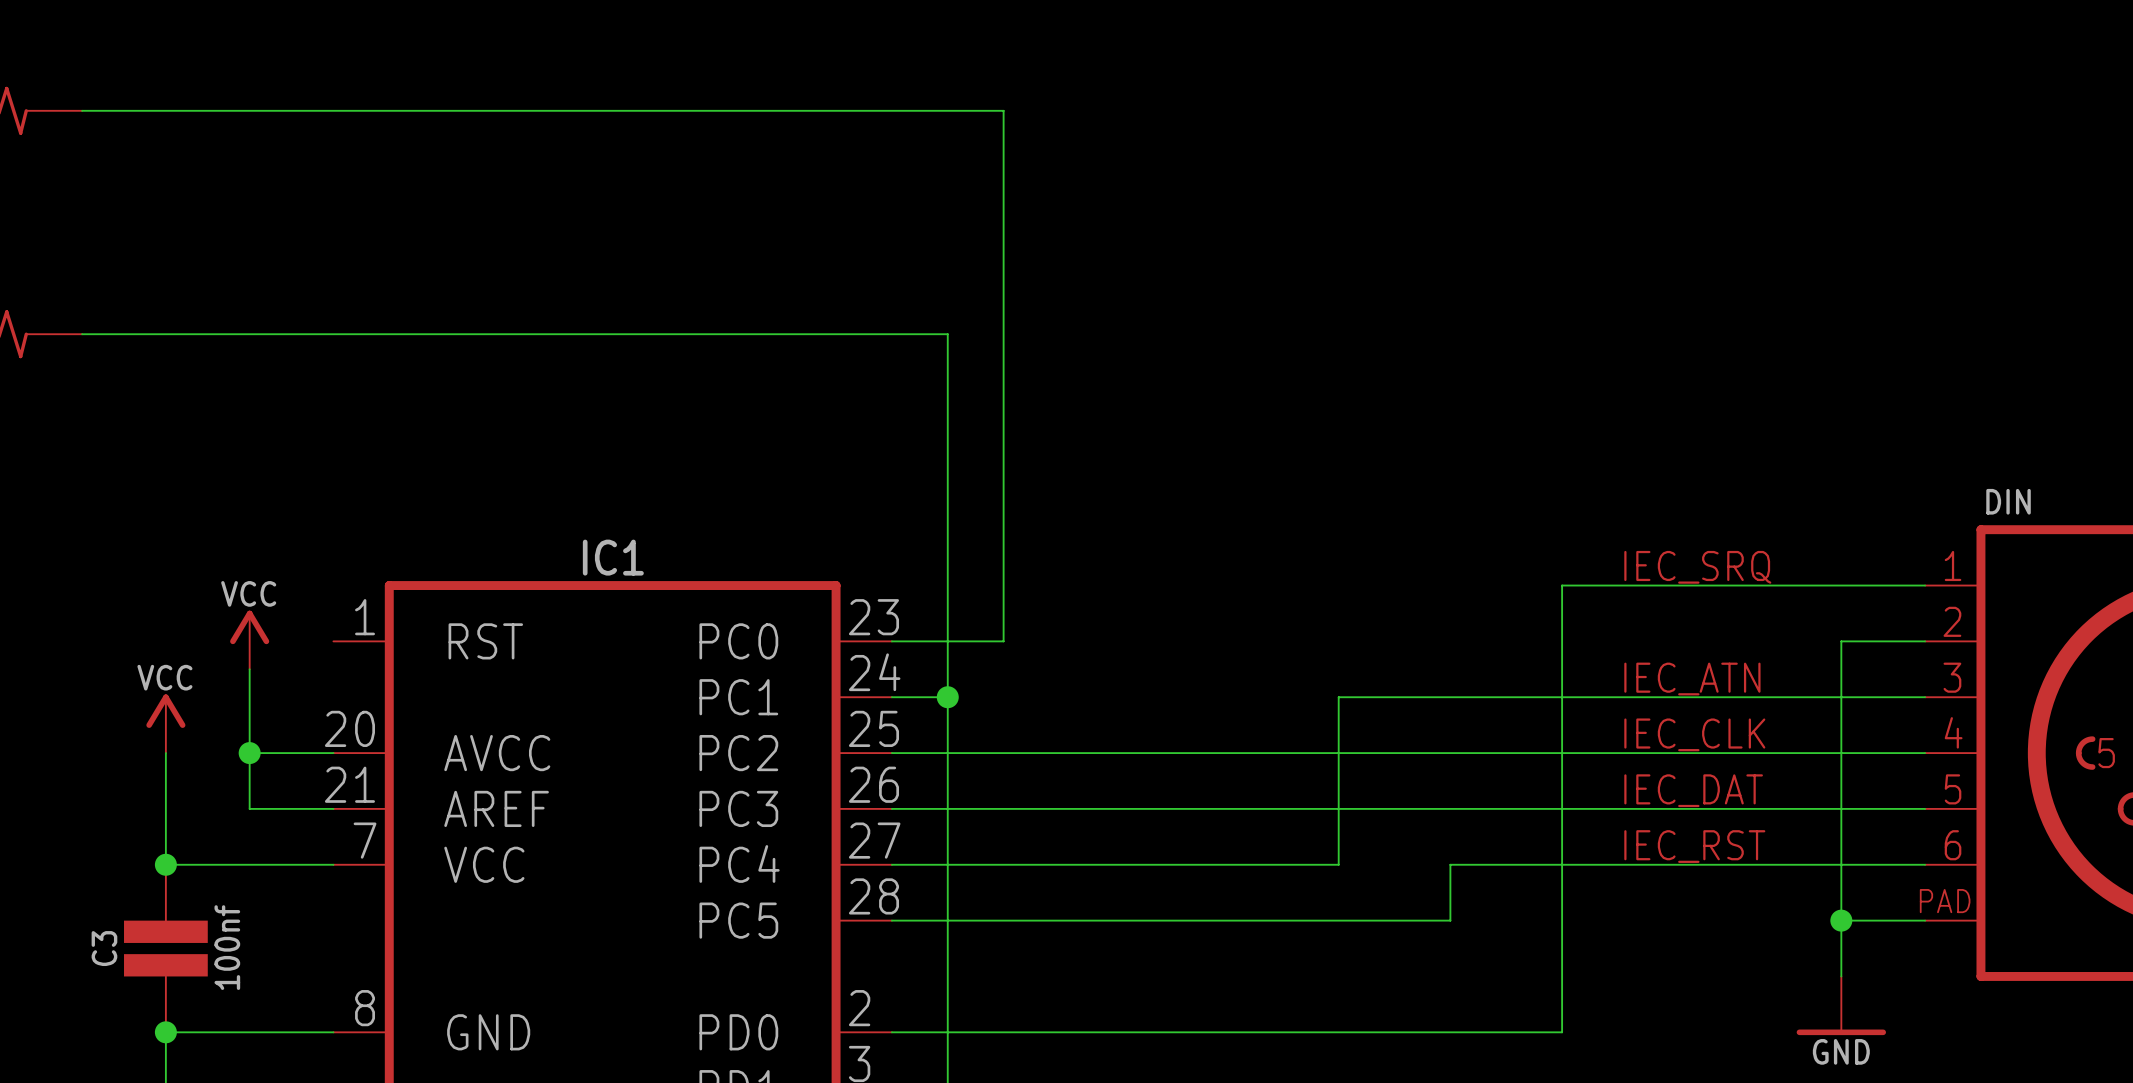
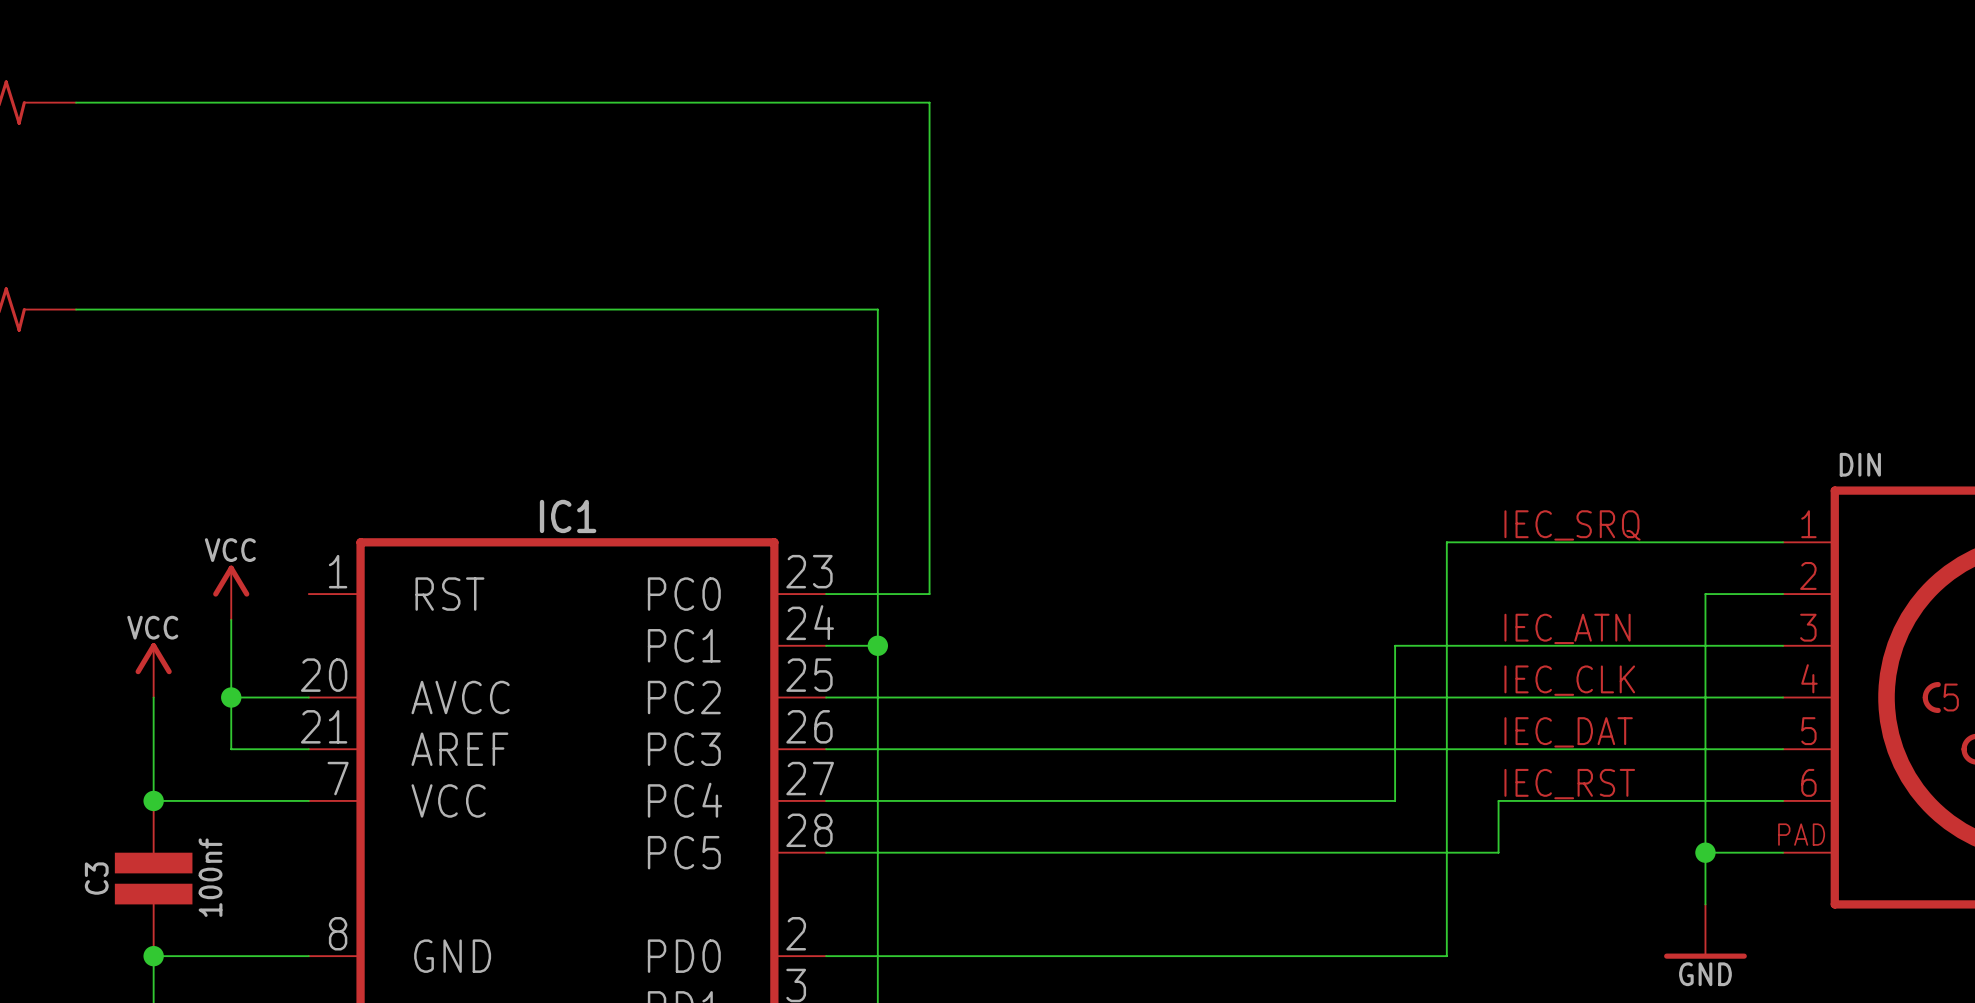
wire: (1506, 697) (1338, 697) (1338, 864) -> (1395, 645) (1395, 800)
wire: (1450, 864) (1450, 920) -> (1343, 800) (1239, 800)
wire: (1506, 864) (1617, 864) -> (1343, 852) (1498, 852) (1498, 800)

